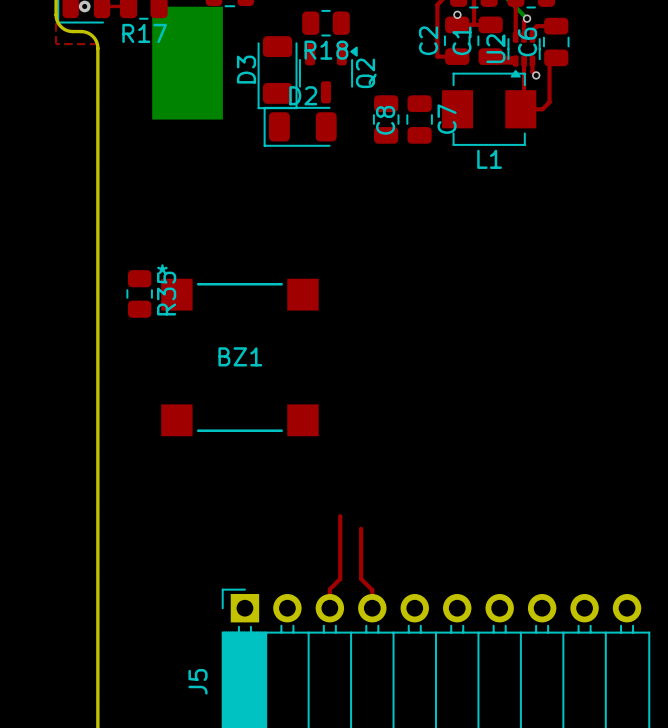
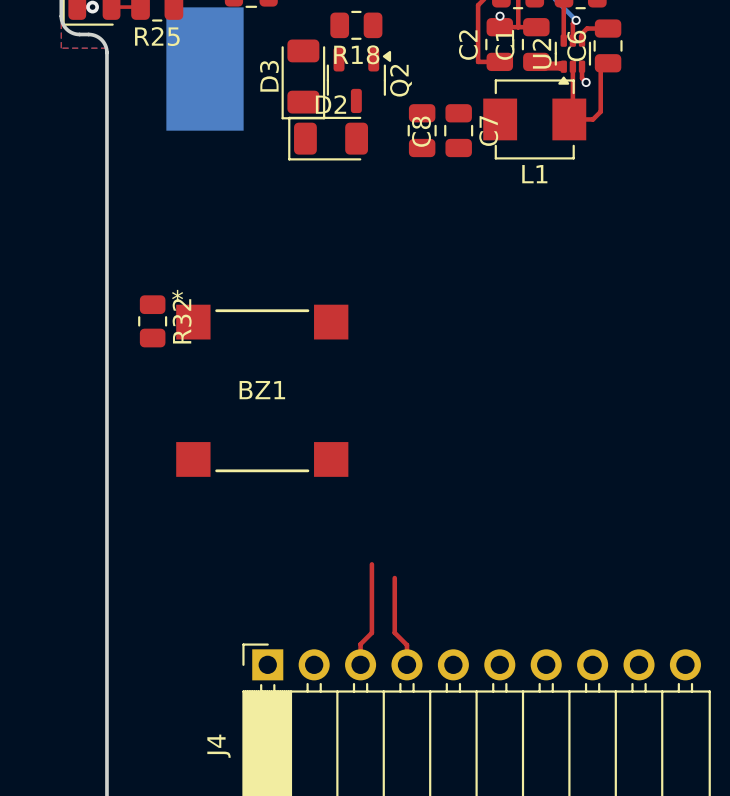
R17 name: R17 (144, 33) -> R25 (157, 36)
R35 name: R35 (166, 293) -> R32 (182, 321)
J5 name: J5 (198, 681) -> J4 (218, 746)

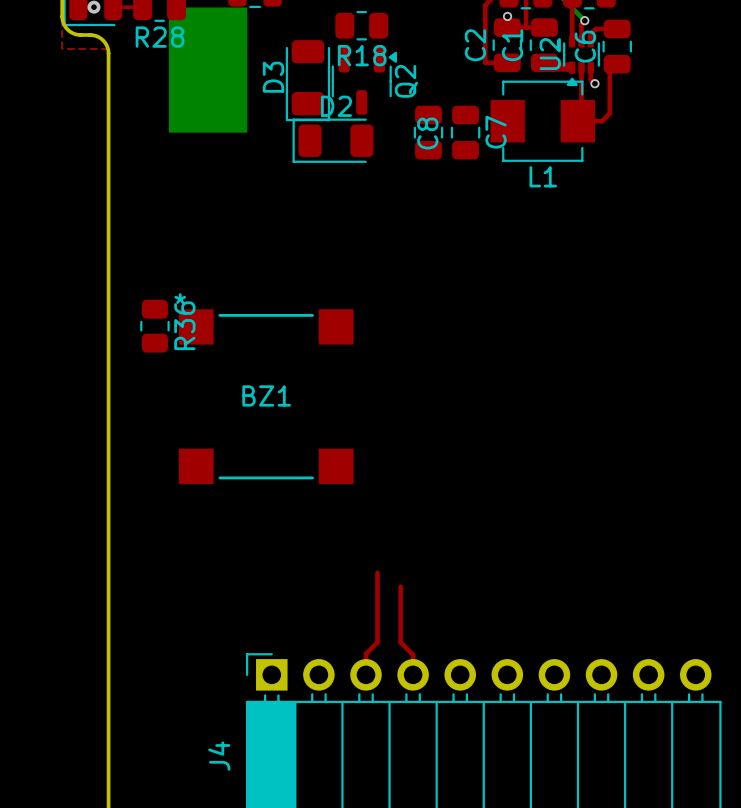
R25 name: R25 (157, 36) -> R28 (160, 37)
R32 name: R32 (182, 321) -> R36 (184, 325)

